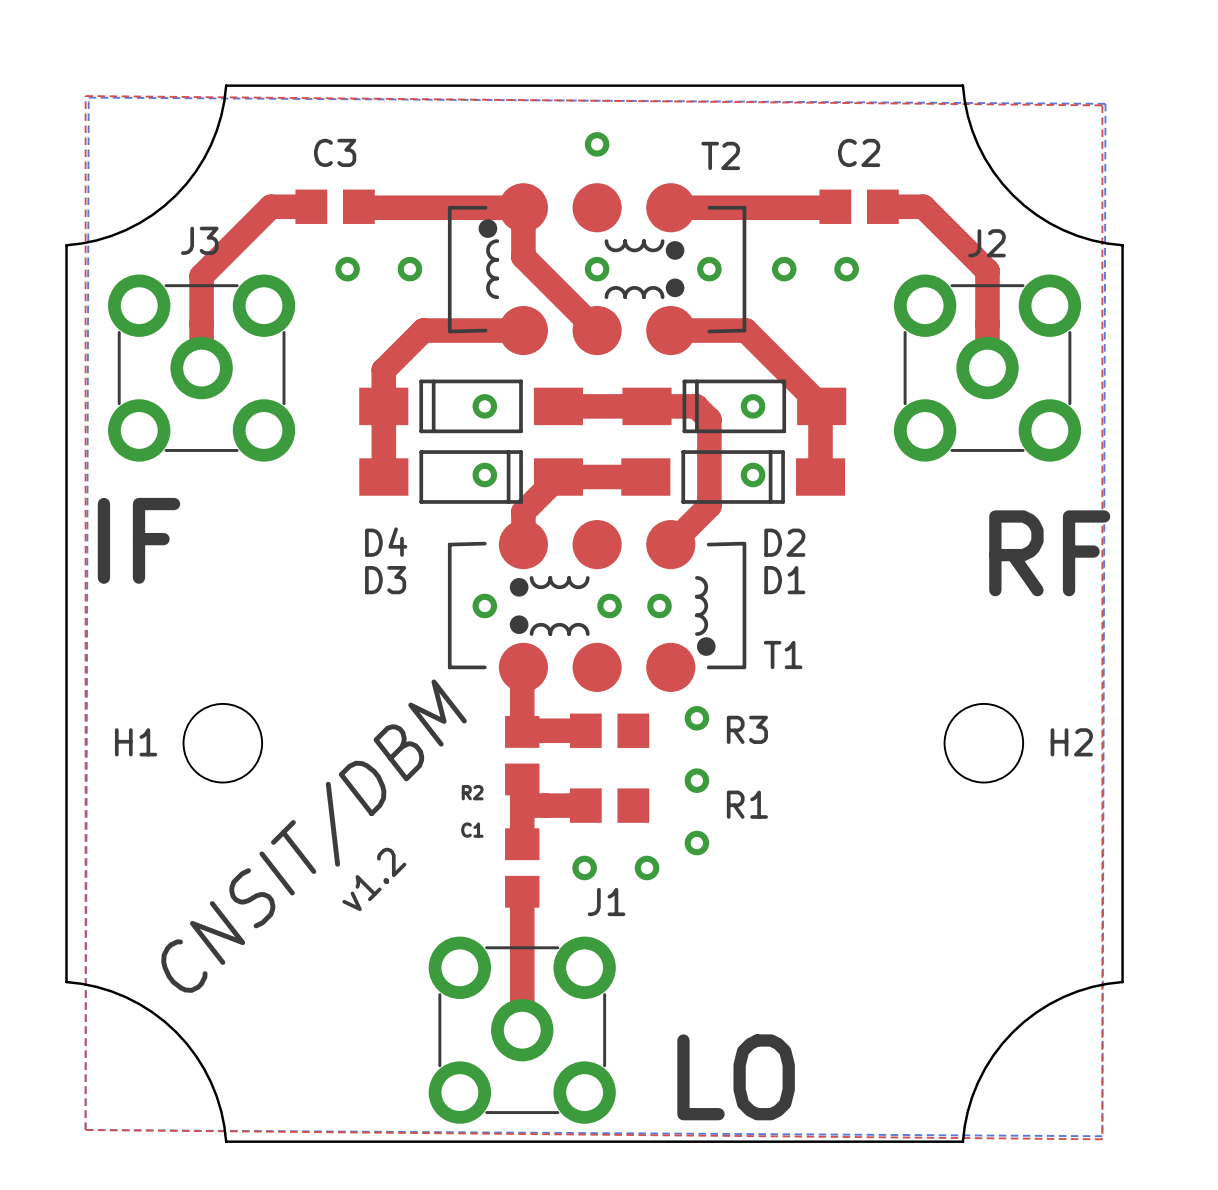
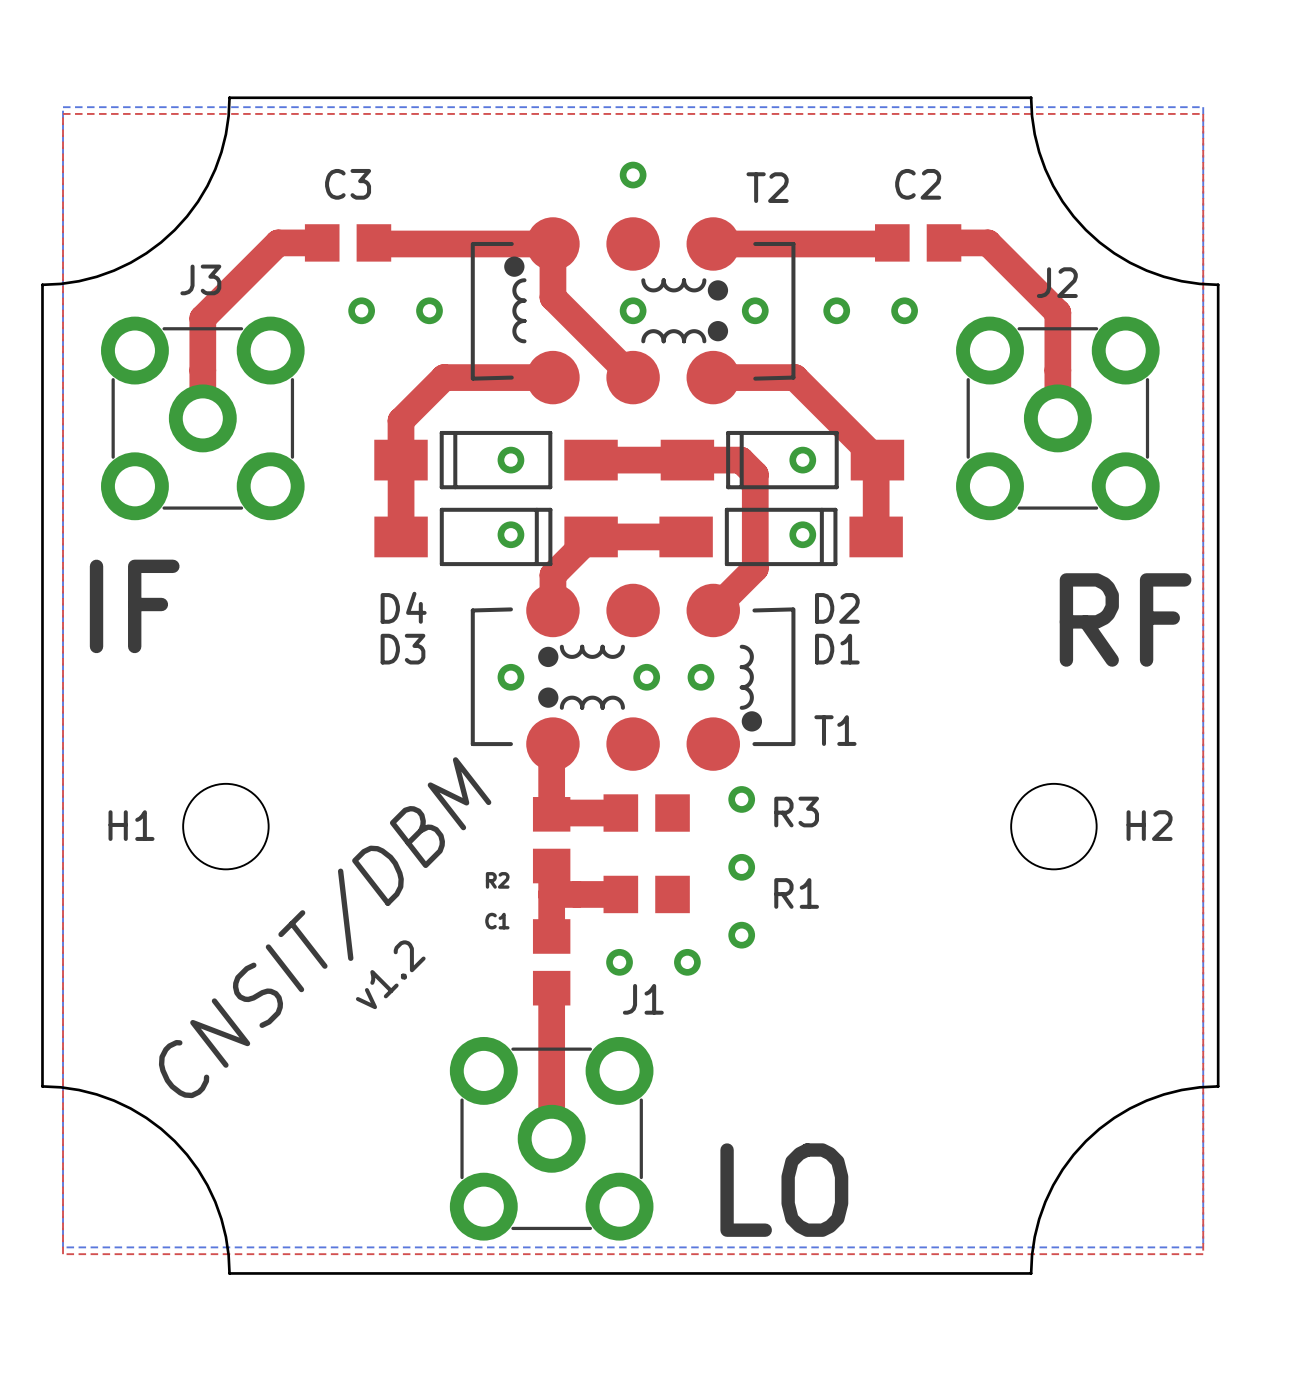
board edge: (226, 85) (962, 85) (967, 115) (978, 144) (993, 171) (1012, 195) (1036, 214) (1063, 230) (1092, 240) (1122, 245) (1122, 982) (1092, 986) (1063, 997) (1036, 1012) (1012, 1032) (993, 1055) (978, 1082) (967, 1111) (962, 1141) (226, 1141) (221, 1111) (211, 1082) (195, 1055) (176, 1032) (152, 1012) (125, 997) (96, 986) (66, 982) (66, 245) (96, 240) (125, 230) (152, 214) (176, 195) (195, 171) (211, 144) (221, 115) (226, 85) -> (229, 97) (225, 134) (215, 169) (198, 201) (174, 230) (146, 253) (114, 270) (78, 281) (42, 284) (42, 1086) (78, 1090) (114, 1100) (146, 1117) (174, 1141) (198, 1169) (215, 1201) (225, 1236) (229, 1273) (1031, 1273) (1034, 1236) (1045, 1201) (1062, 1169) (1085, 1141) (1114, 1117) (1146, 1100) (1181, 1090) (1218, 1086) (1218, 284) (1181, 281) (1146, 270) (1114, 253) (1085, 230) (1062, 201) (1045, 169) (1034, 134) (1031, 97) (229, 97)
top zone outline: (85, 96) (1102, 105) (1102, 1139) (85, 1129) (85, 96) -> (63, 113) (63, 1254) (1203, 1254) (1203, 113) (63, 113)
bottom zone outline: (88, 97) (1105, 103) (1102, 1136) (85, 1129) (88, 97) -> (63, 107) (63, 1247) (1203, 1247) (1203, 107) (63, 107)

